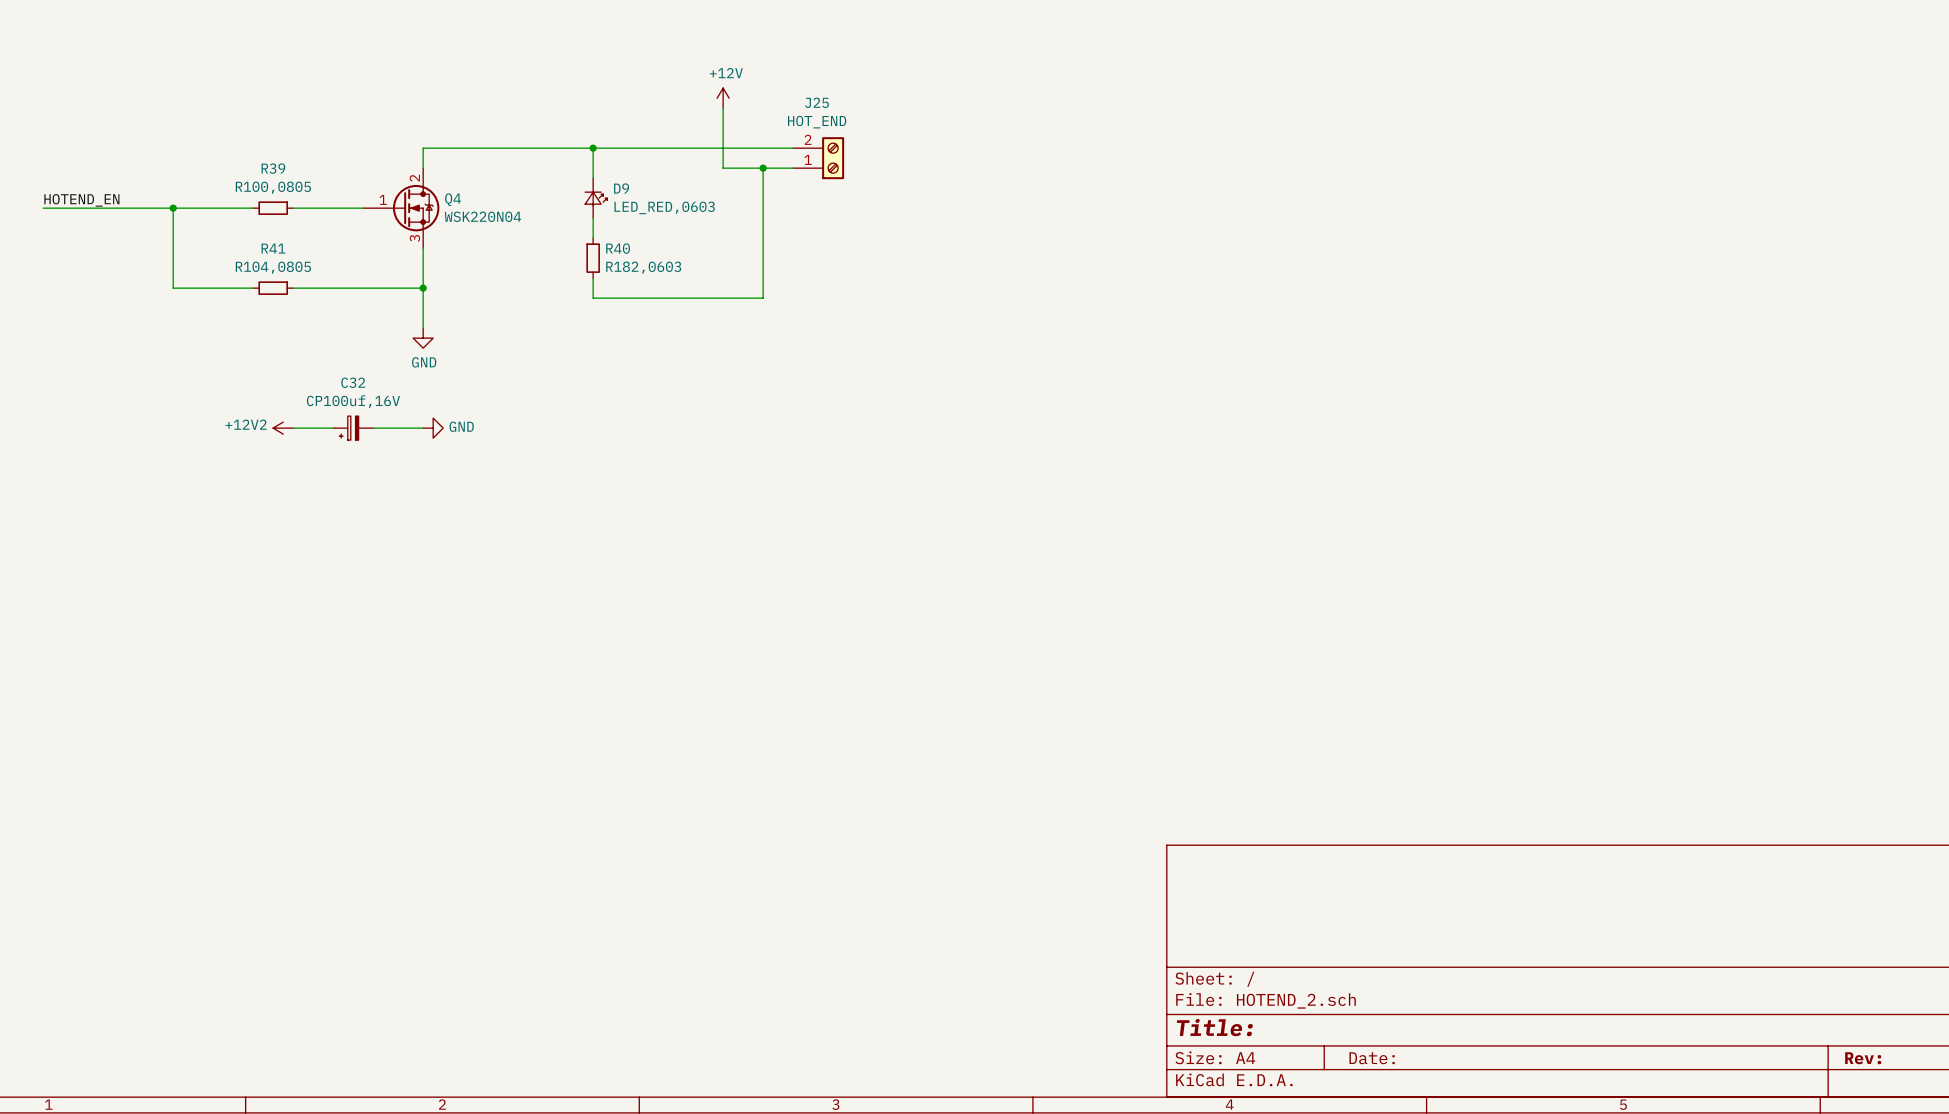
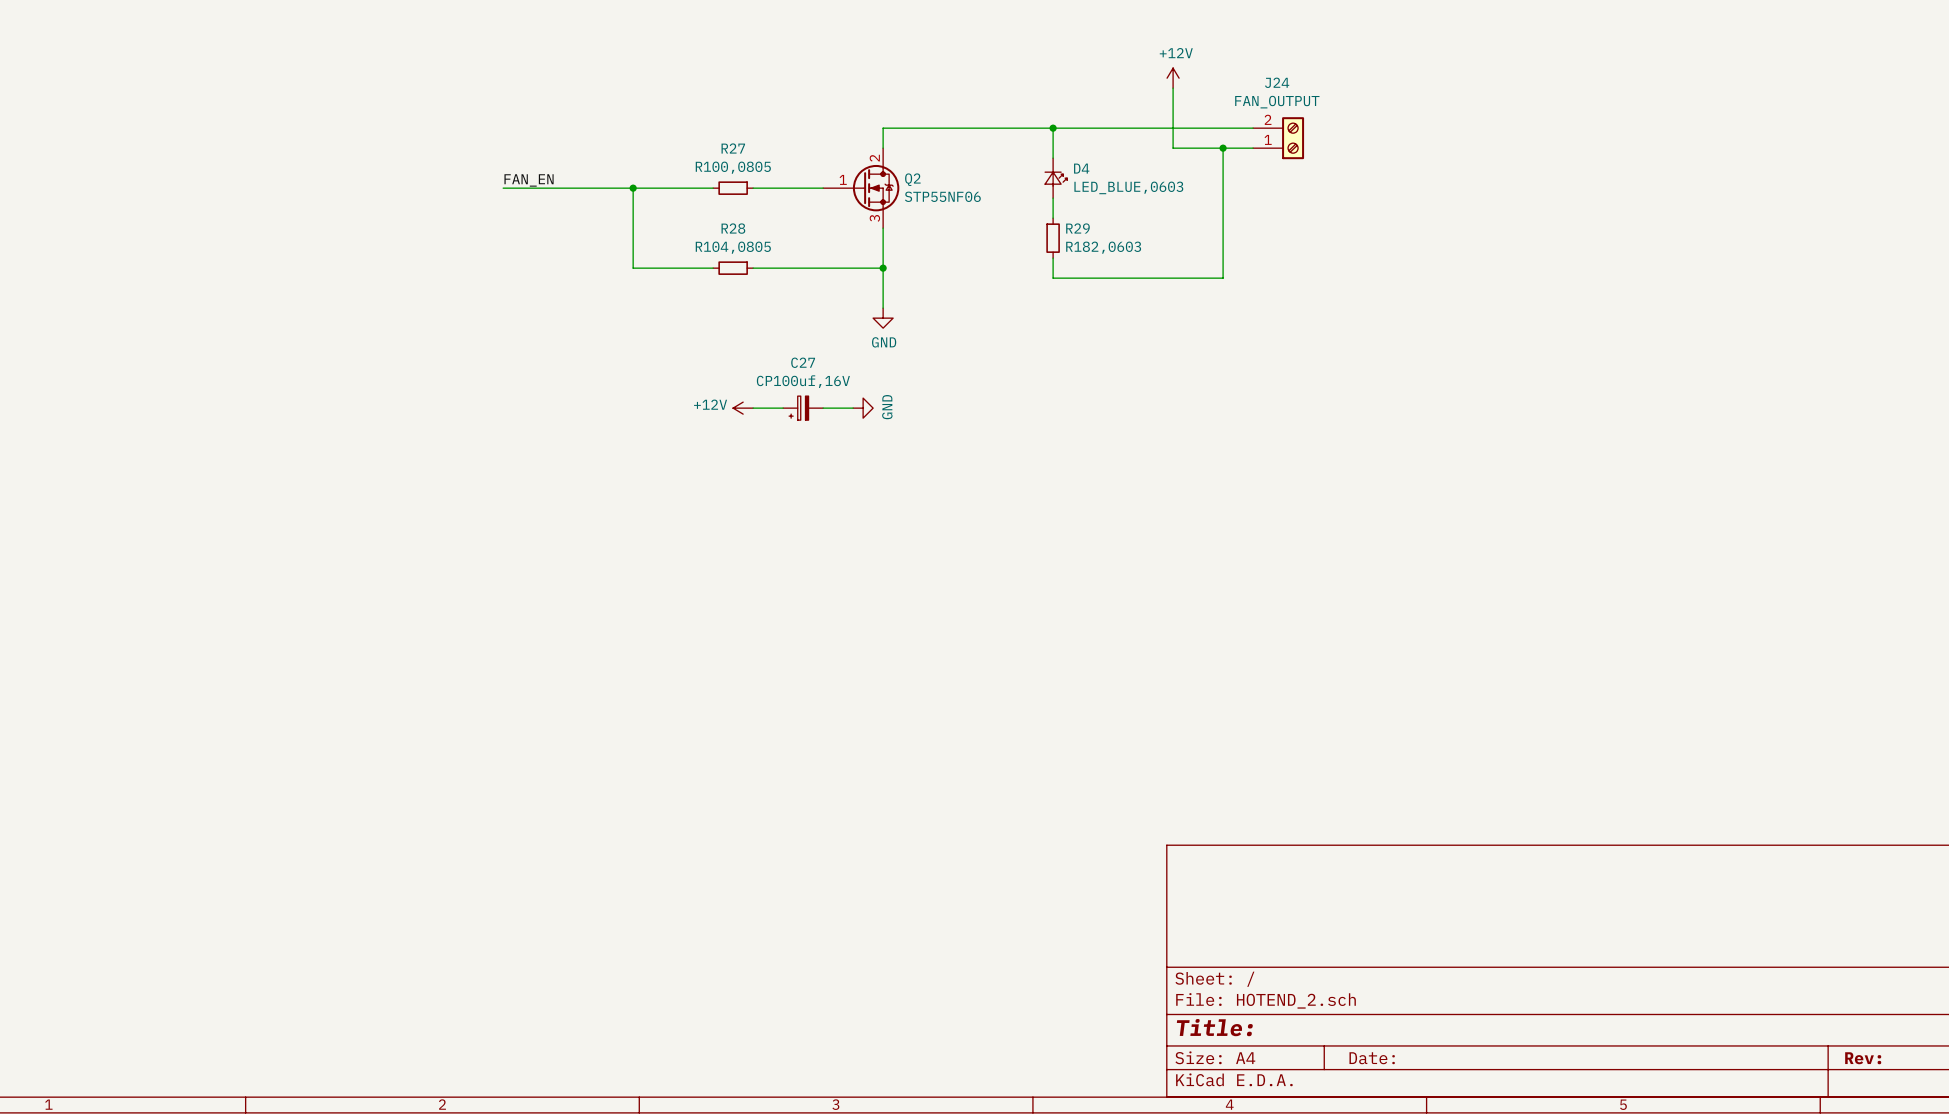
power symbol: none -> +12V (1173, 78)
wire: none -> (1173, 88) (1173, 148) (1253, 148)
power symbol: +12V (723, 98) -> none
wire: (723, 108) (723, 168) (793, 168) -> none
wire: none -> (1053, 128) (1053, 158)
junction: none -> (1053, 128)
wire: none -> (1253, 128) (883, 128) (883, 148)
J24: none -> FAN_OUTPUT (1278, 138)
wire: (593, 148) (593, 178) -> none
junction: (593, 148) -> none
wire: (793, 148) (423, 148) (423, 168) -> none
wire: none -> (1223, 148) (1223, 278) (1053, 278) (1053, 258)
junction: none -> (1223, 148)
J25: HOT_END (818, 158) -> none
wire: (763, 168) (763, 298) (593, 298) (593, 278) -> none
junction: (763, 168) -> none
D4: none -> LED_BLUE,0603 (1056, 178)
label: none -> FAN_EN (529, 180)
wire: none -> (503, 188) (713, 188)
wire: none -> (633, 188) (633, 268) (713, 268)
junction: none -> (633, 188)
R27: none -> R100,0805 (733, 188)
wire: none -> (753, 188) (823, 188)
Q2: none -> STP55NF06 (861, 188)
D9: LED_RED,0603 (596, 198) -> none
wire: none -> (1053, 198) (1053, 218)
label: HOTEND_EN (81, 200) -> none
wire: (43, 208) (253, 208) -> none
wire: (173, 208) (173, 288) (253, 288) -> none
junction: (173, 208) -> none
R39: R100,0805 (273, 208) -> none
wire: (293, 208) (363, 208) -> none
Q4: WSK220N04 (401, 208) -> none
wire: (593, 218) (593, 238) -> none
wire: none -> (883, 228) (883, 308)
R29: none -> R182,0603 (1053, 238)
wire: (423, 248) (423, 328) -> none
R40: R182,0603 (593, 258) -> none
R28: none -> R104,0805 (733, 268)
wire: none -> (753, 268) (883, 268)
junction: none -> (883, 268)
R41: R104,0805 (273, 288) -> none
wire: (293, 288) (423, 288) -> none
junction: (423, 288) -> none
power symbol: none -> GND (883, 318)
power symbol: GND (423, 338) -> none
power symbol: none -> +12V (743, 408)
wire: none -> (753, 408) (783, 408)
C27: none -> CP100uf,16V (803, 408)
wire: none -> (823, 408) (853, 408)
power symbol: none -> GND (863, 408)
power symbol: +12V2 (283, 428) -> none
wire: (293, 428) (333, 428) -> none
C32: CP100uf,16V (353, 428) -> none
wire: (373, 428) (423, 428) -> none
power symbol: GND (433, 428) -> none

